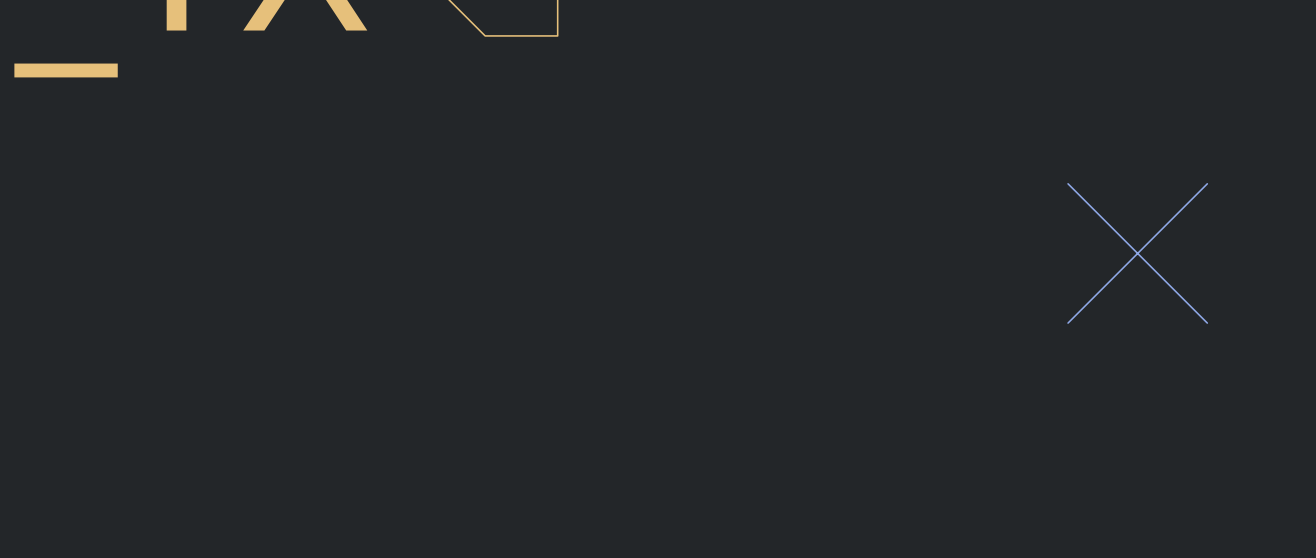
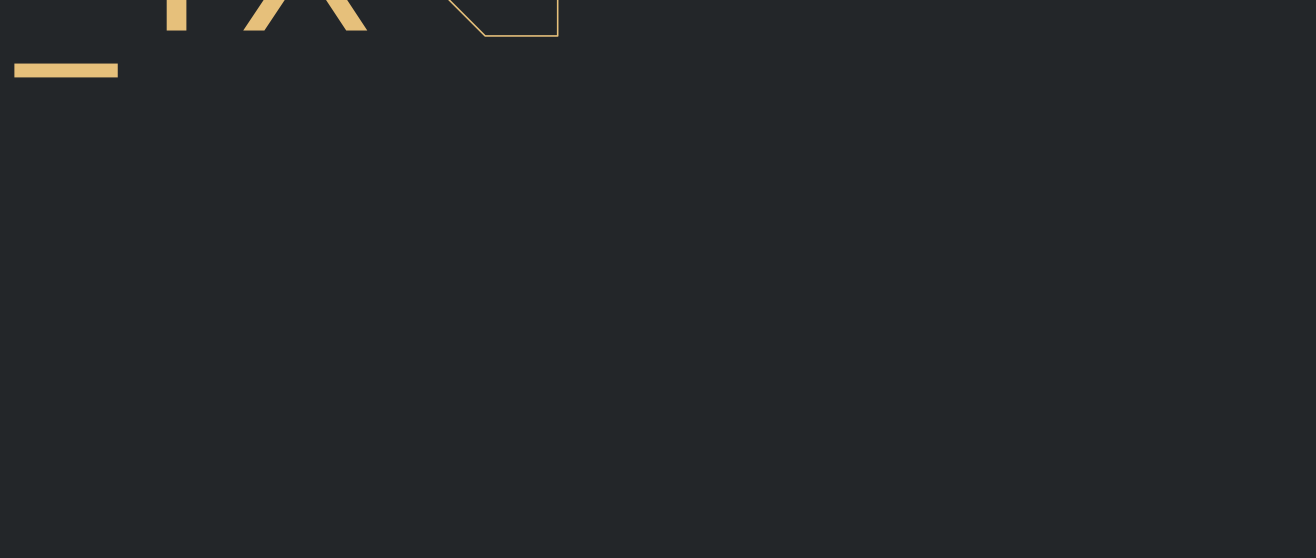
no-connect mark: (1137, 253) -> none

